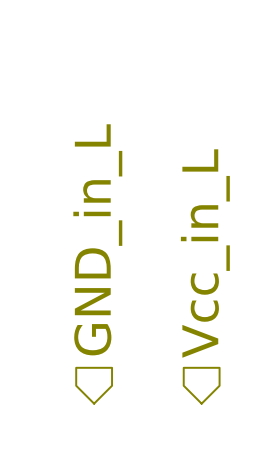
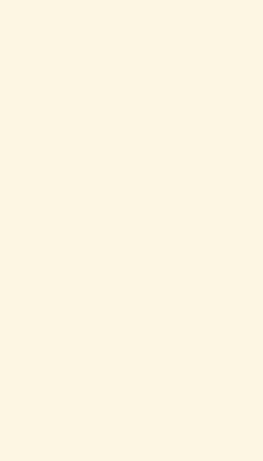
hierarchical label: GND_in_L (97, 239) -> none
hierarchical label: Vcc_in_L (205, 253) -> none

